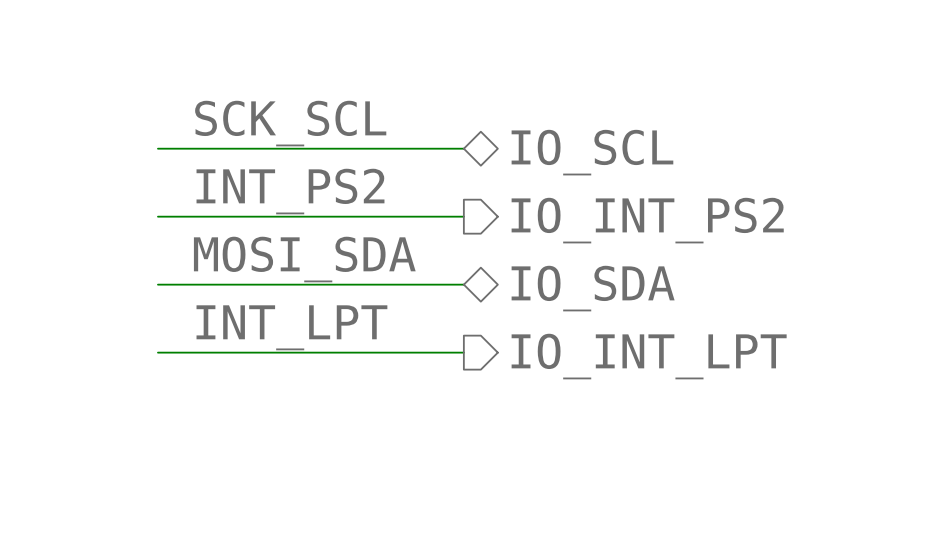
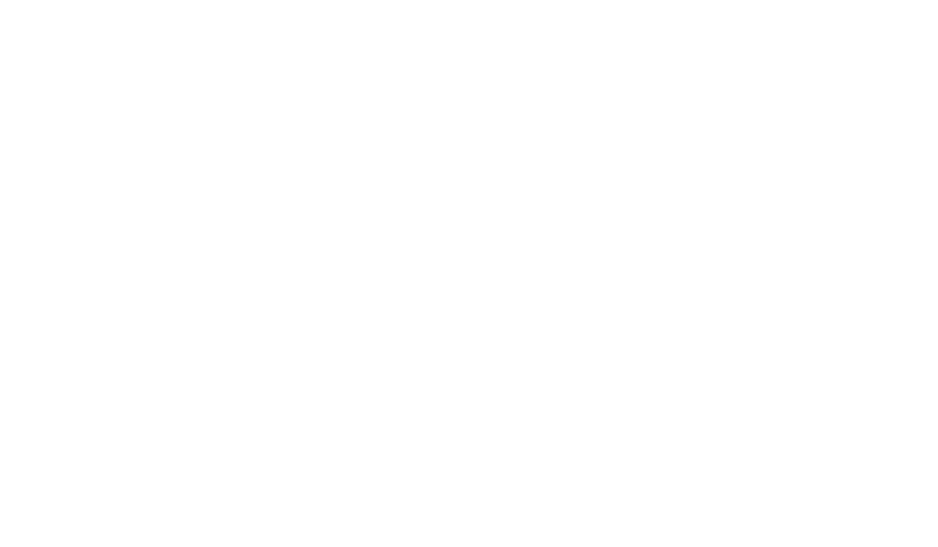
label: SCK_SCL (290, 123) -> none
wire: (157, 148) (463, 148) -> none
hierarchical label: IO_SCL (592, 152) -> none
label: INT_PS2 (290, 191) -> none
wire: (157, 216) (463, 216) -> none
hierarchical label: IO_INT_PS2 (647, 220) -> none
label: MOSI_SDA (304, 259) -> none
wire: (157, 284) (463, 284) -> none
hierarchical label: IO_SDA (593, 288) -> none
label: INT_LPT (291, 327) -> none
wire: (157, 352) (463, 352) -> none
hierarchical label: IO_INT_LPT (649, 356) -> none

